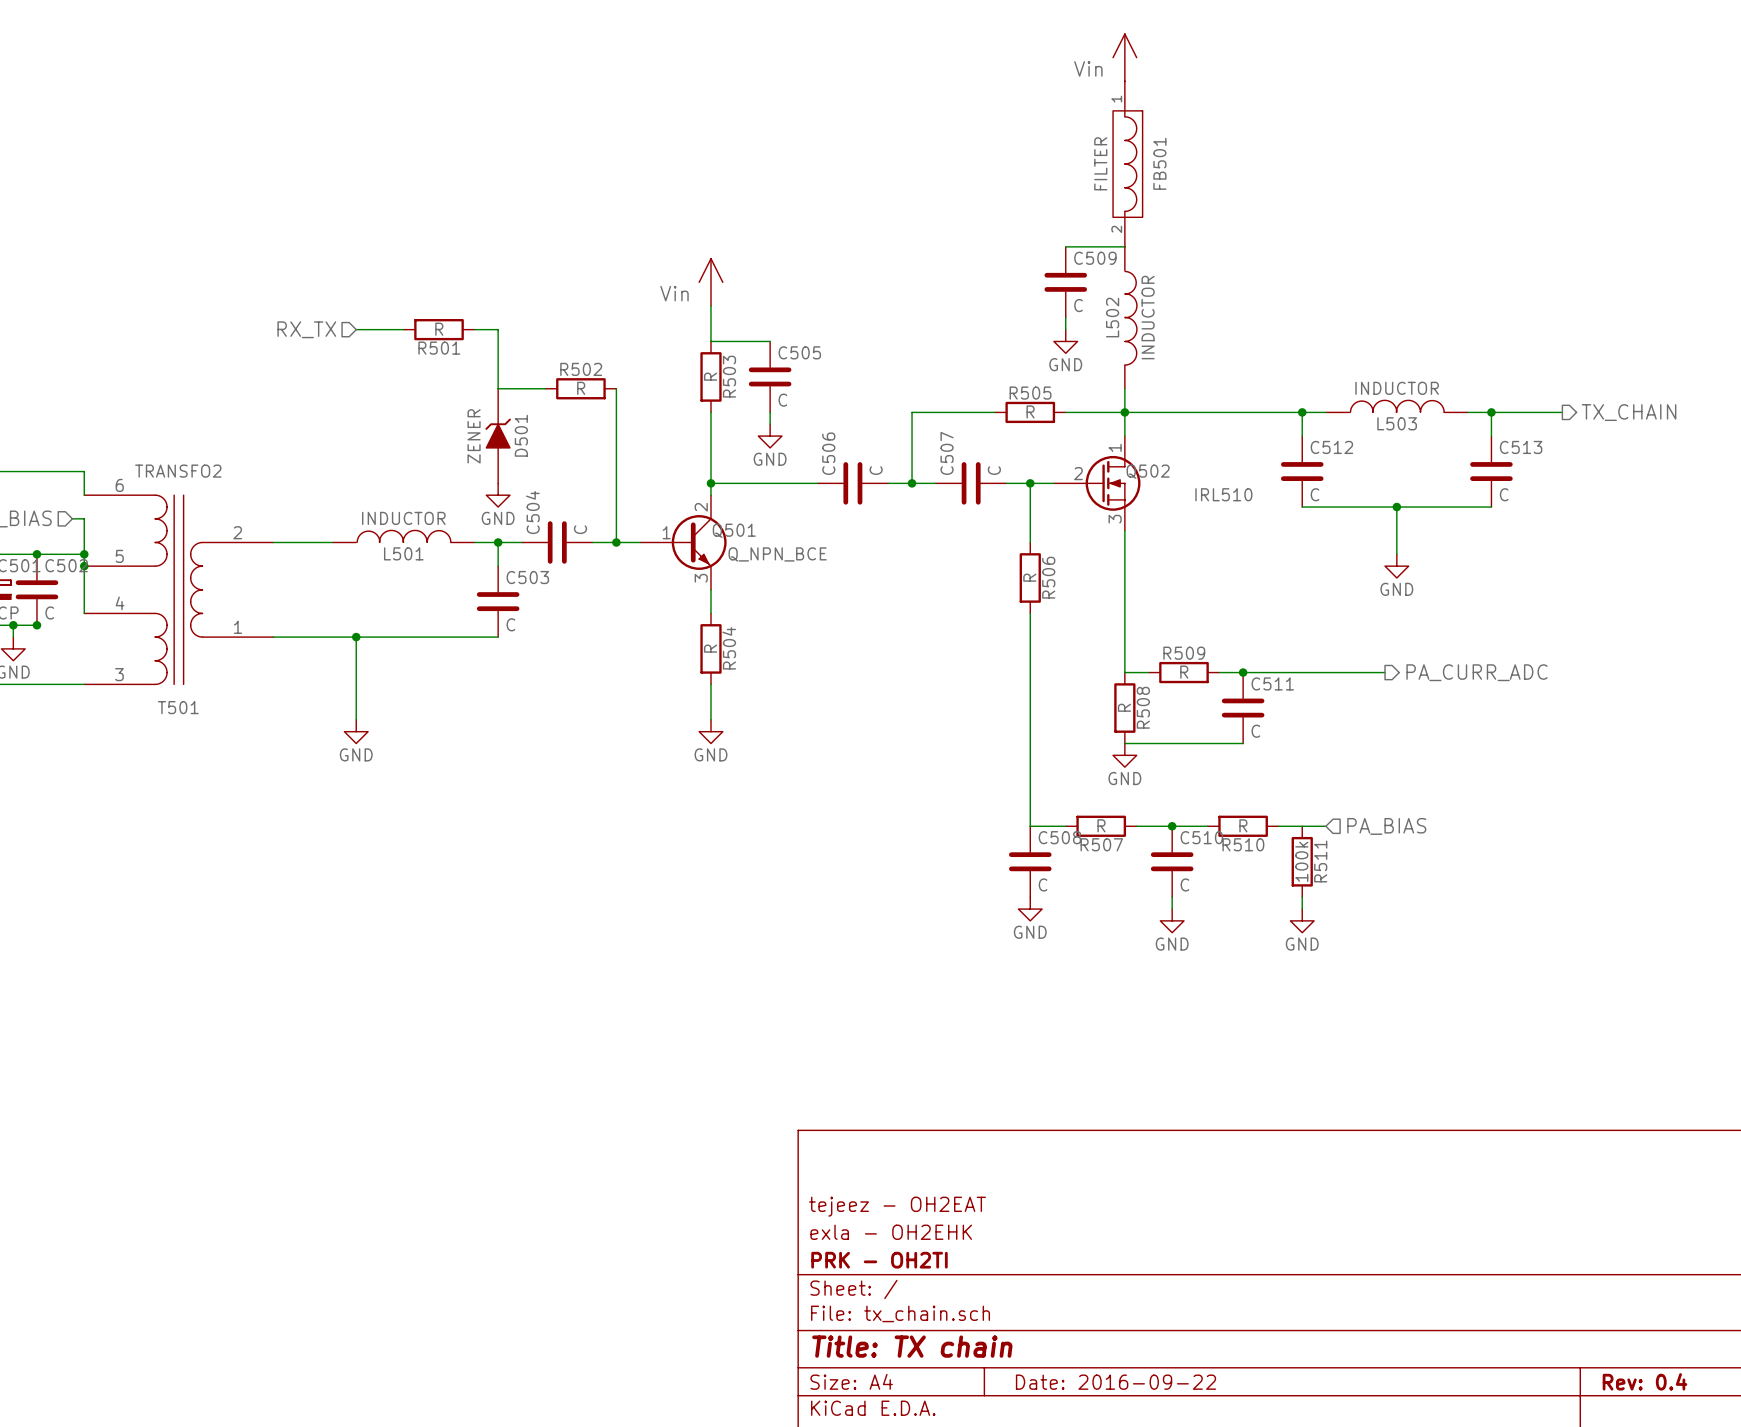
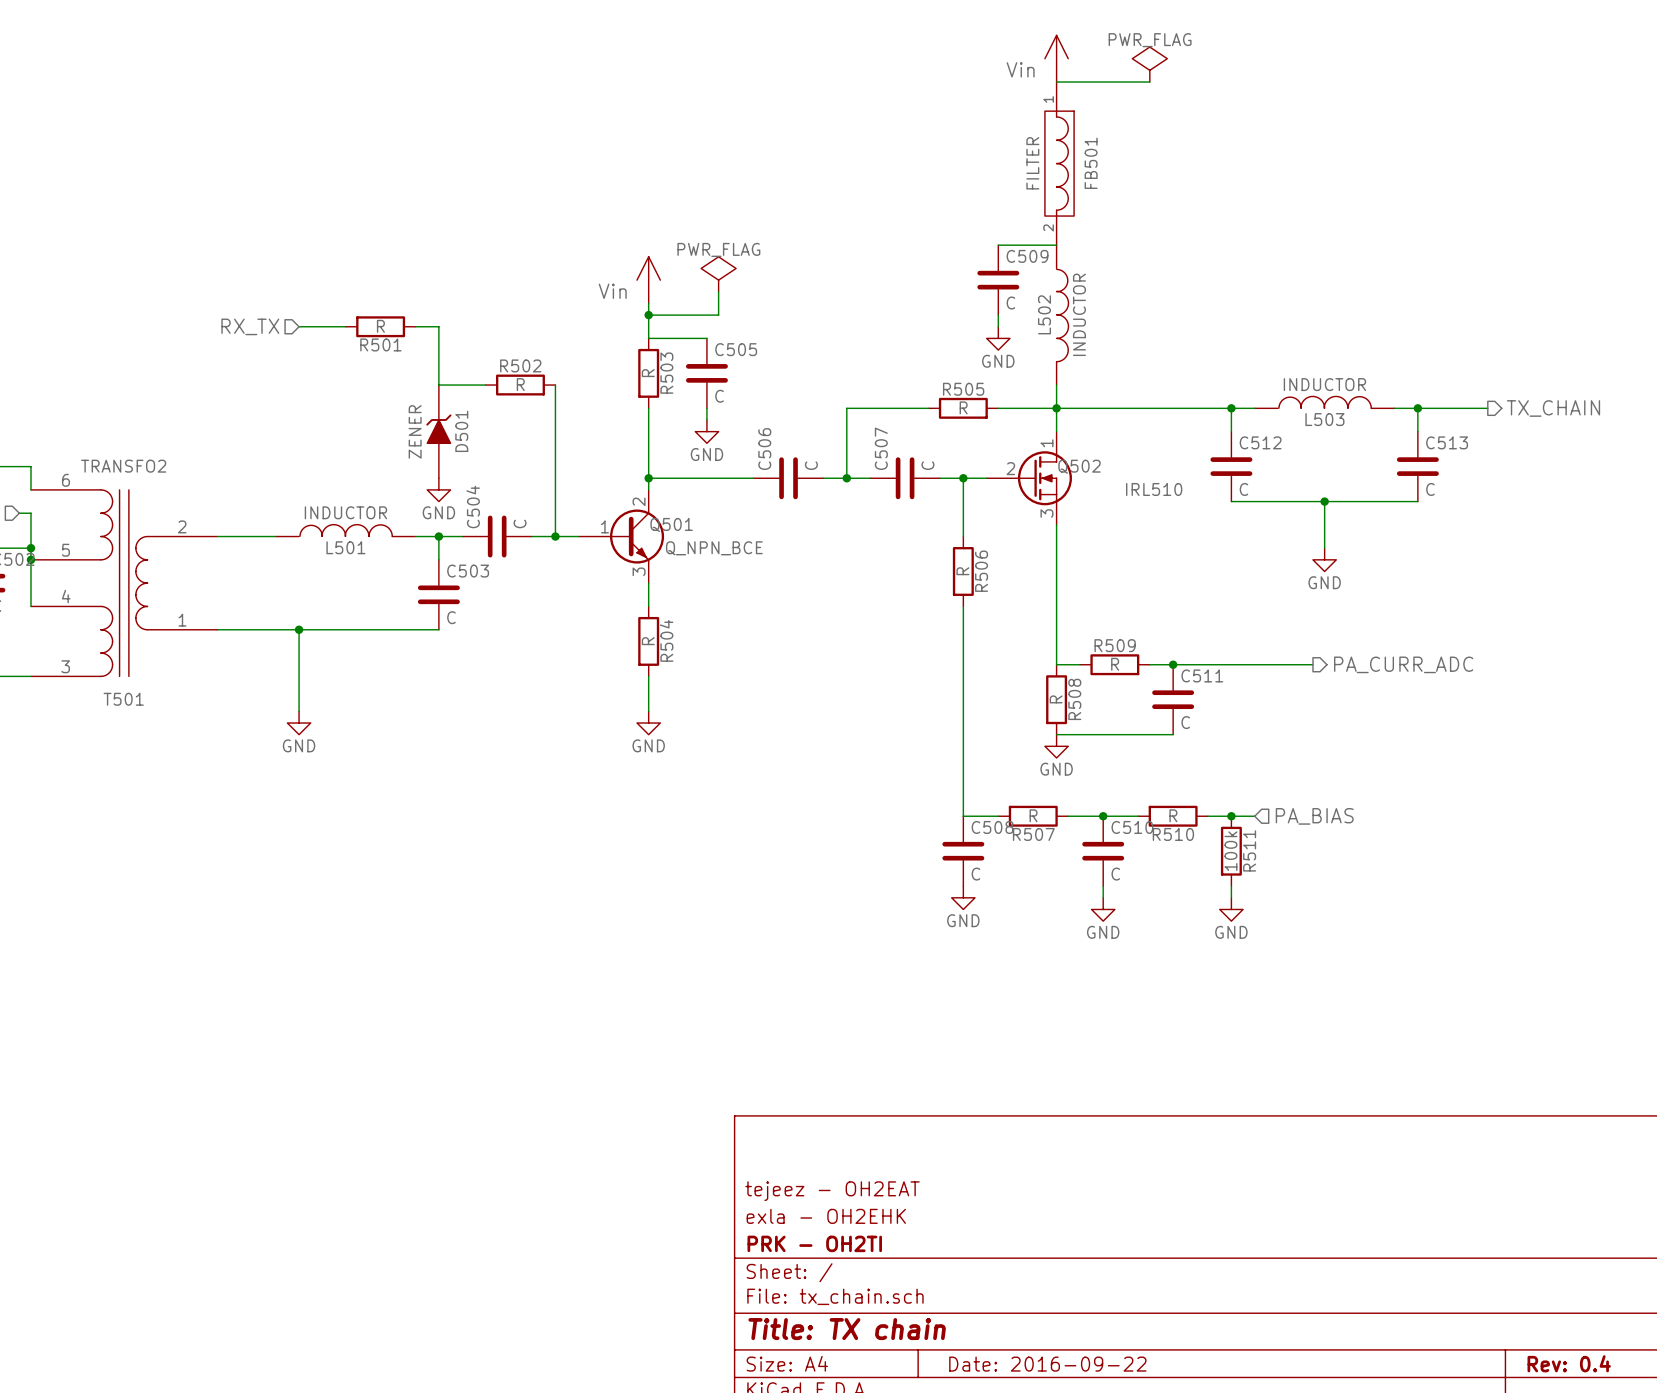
power symbol: none -> PWR_FLAG (1149, 64)
wire: none -> (1056, 82) (1149, 82)
power symbol: none -> PWR_FLAG (718, 274)
wire: none -> (718, 291) (718, 315) (648, 315)
junction: none -> (648, 315)
junction: none -> (1231, 816)

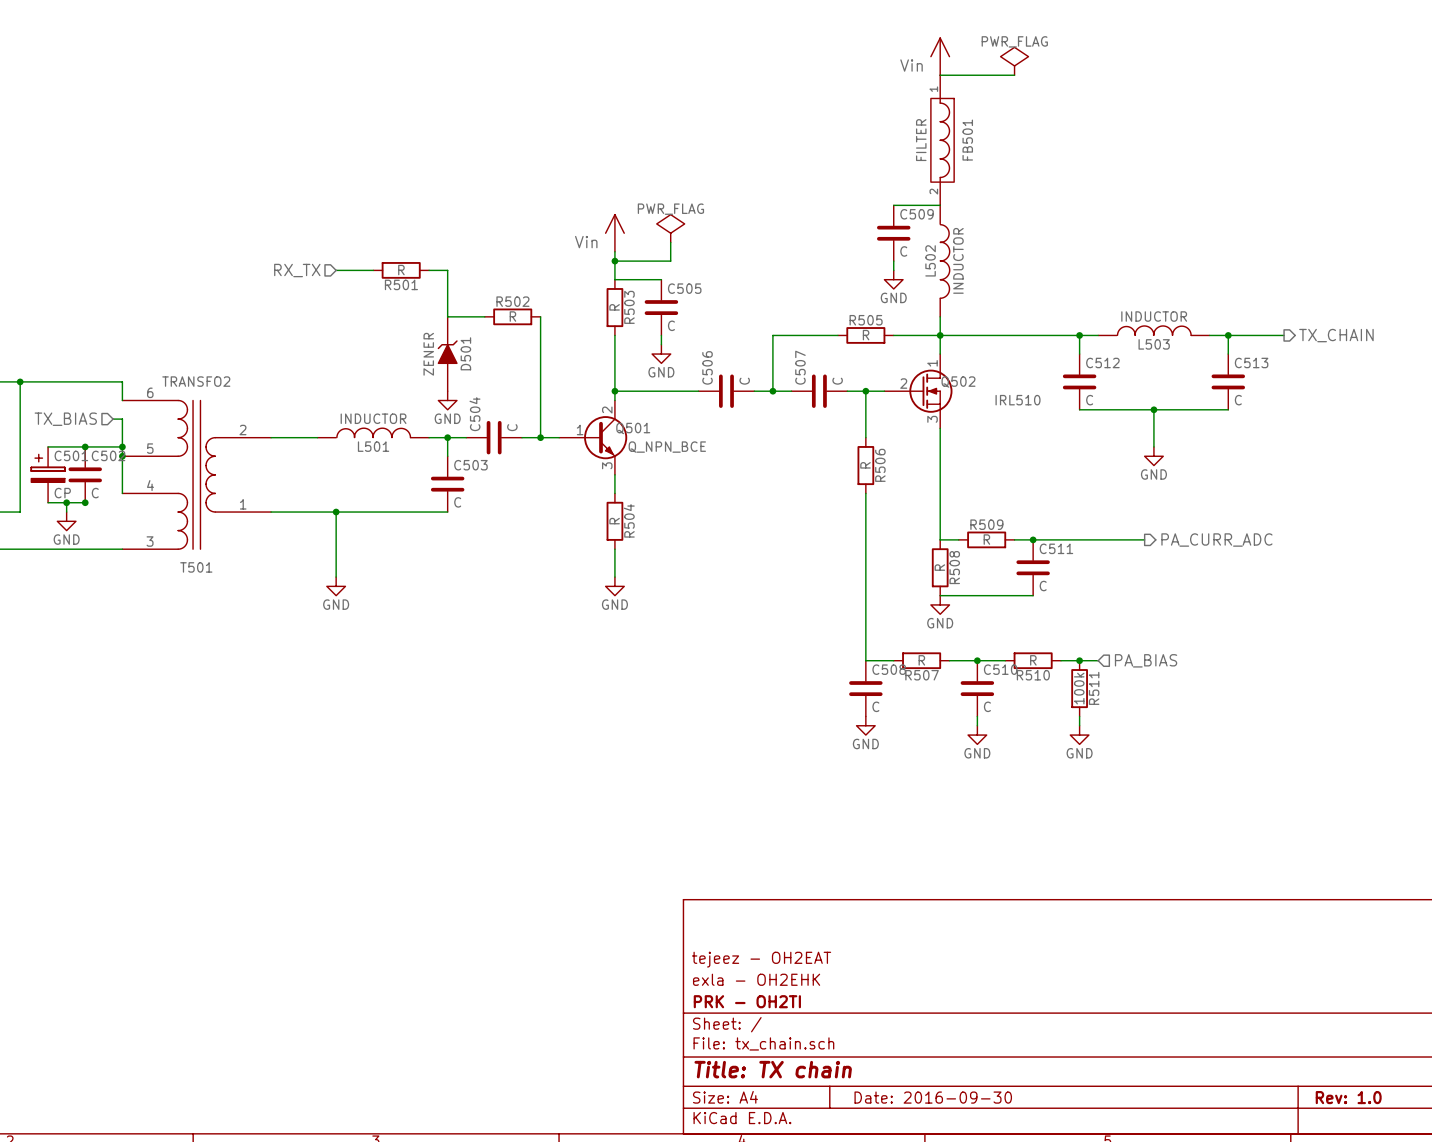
title block: Rev: 0.4 (1569, 1363) -> Rev: 1.0 (1348, 1097)
title block: Date: 2016-09-22 (1047, 1364) -> Date: 2016-09-30 (933, 1097)

